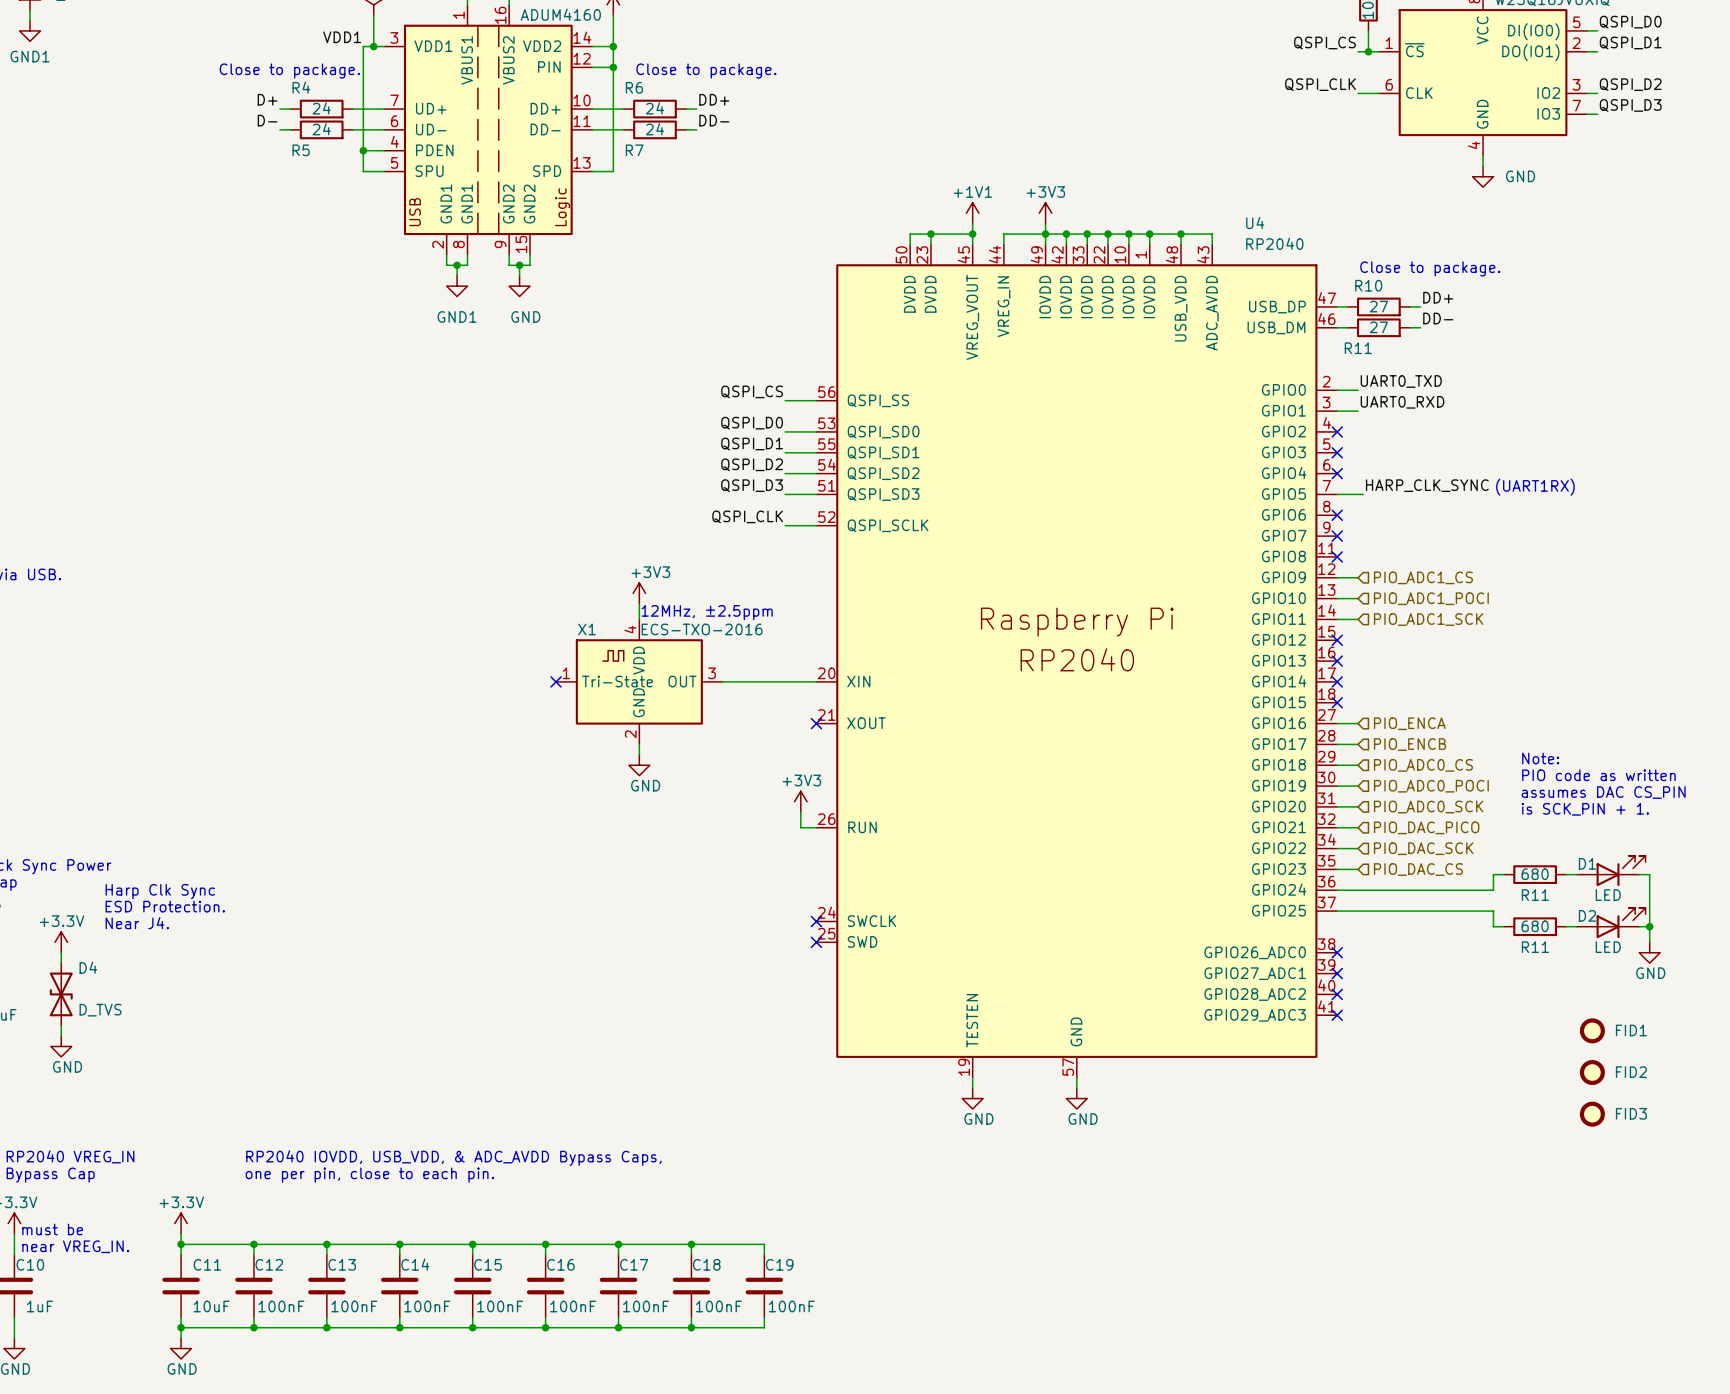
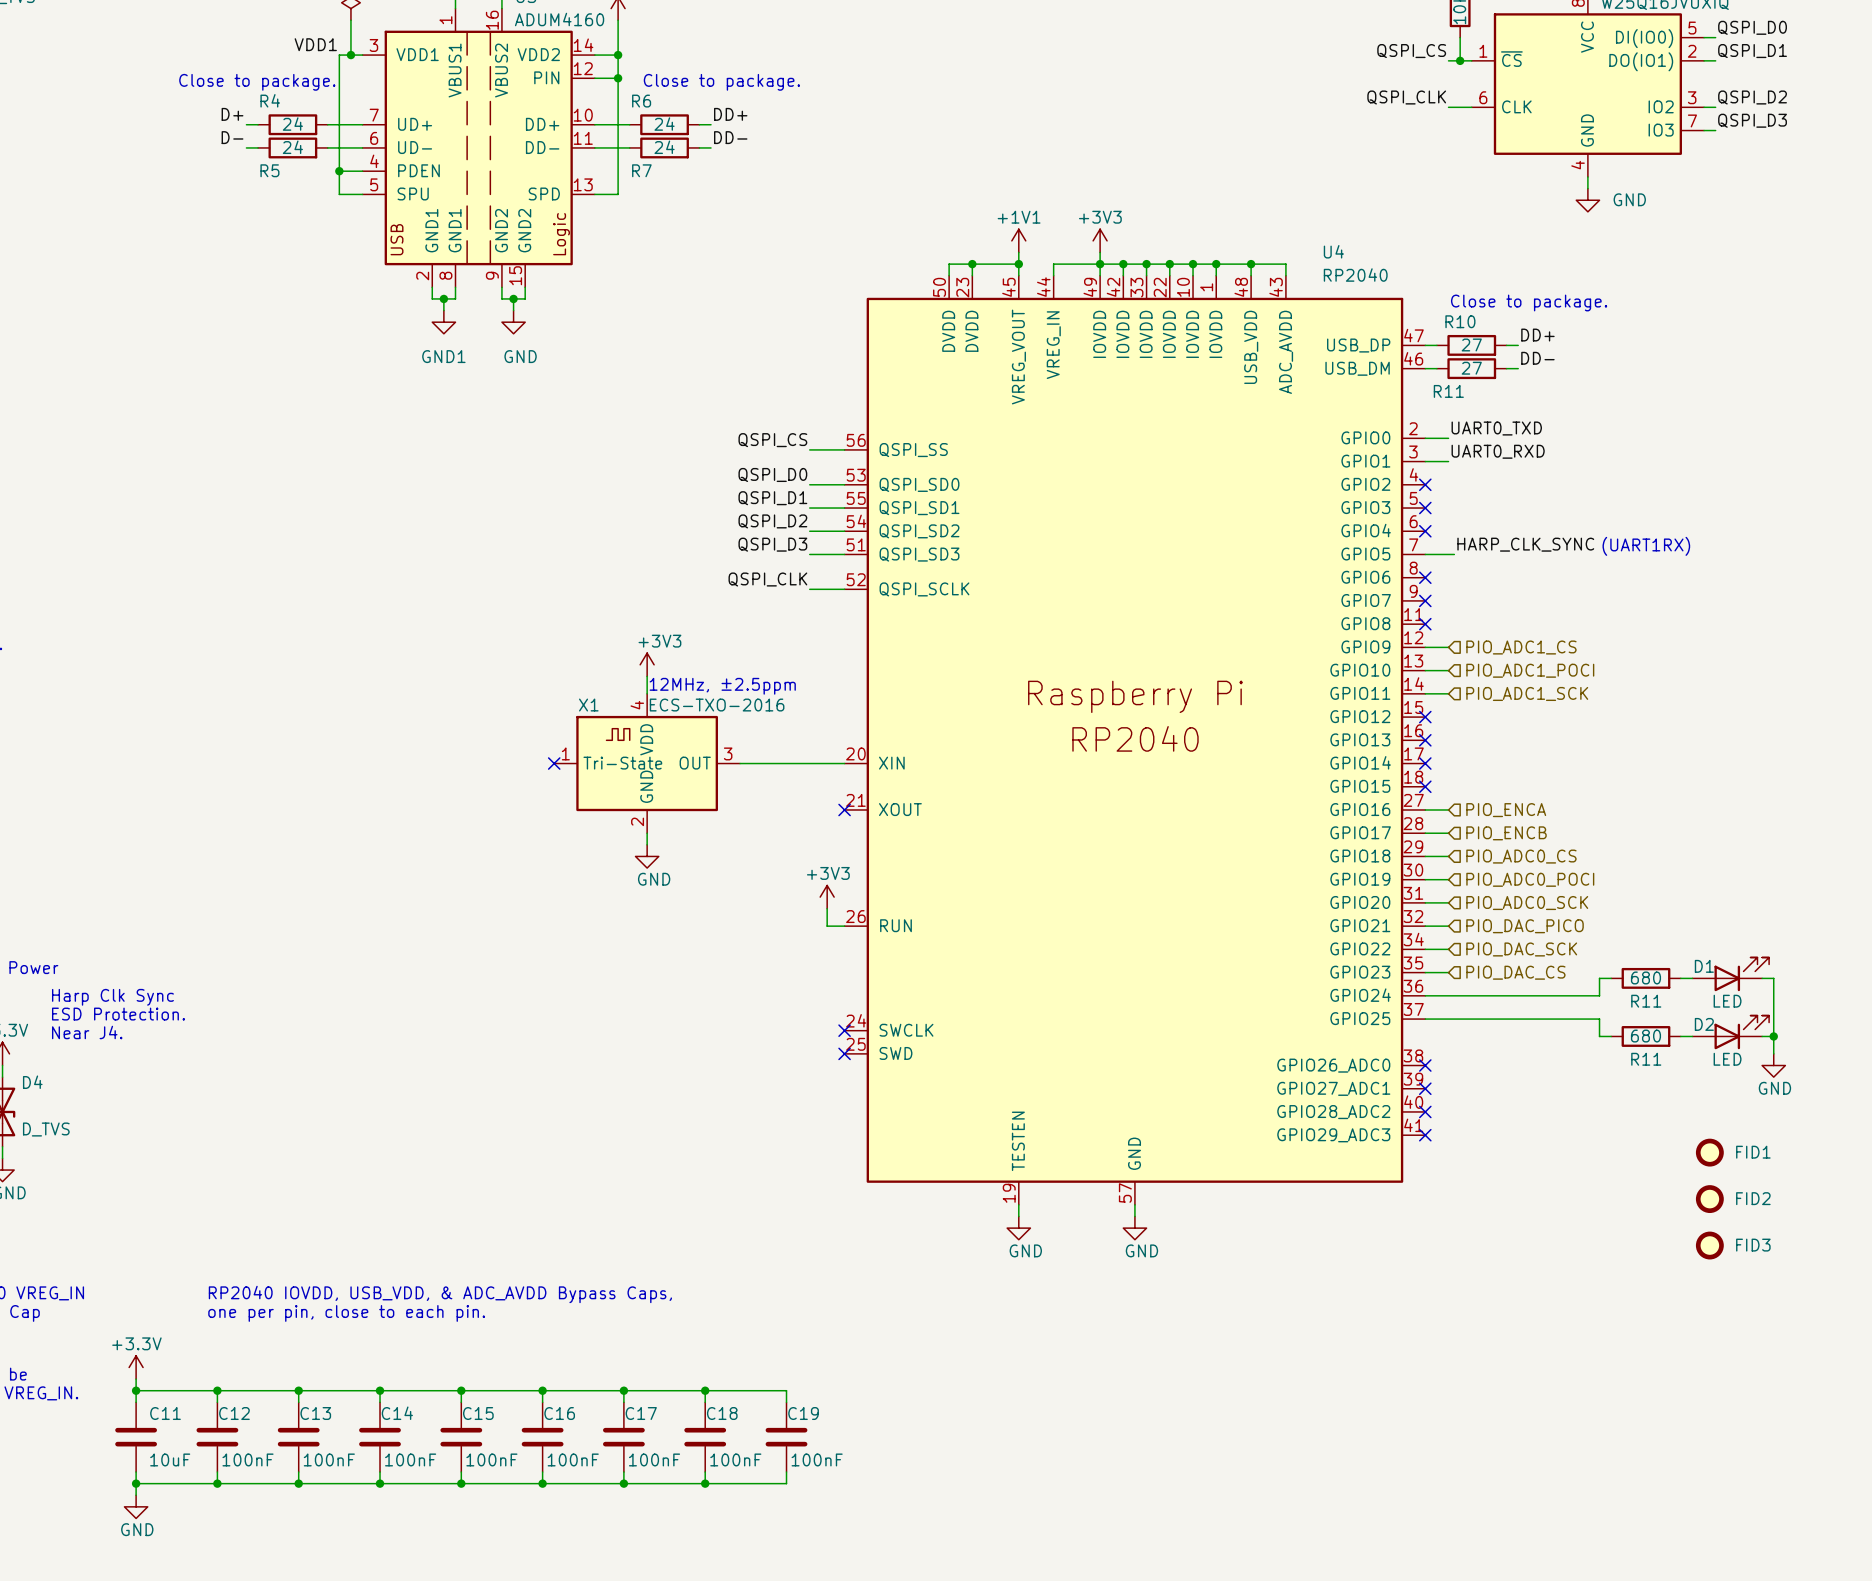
text: Note: (1540, 758) -> none
text: PIO code as written (1598, 775) -> none
text: assumes DAC CS_PIN (1603, 792) -> none
text: is SCK_PIN + 1. (1585, 809) -> none

